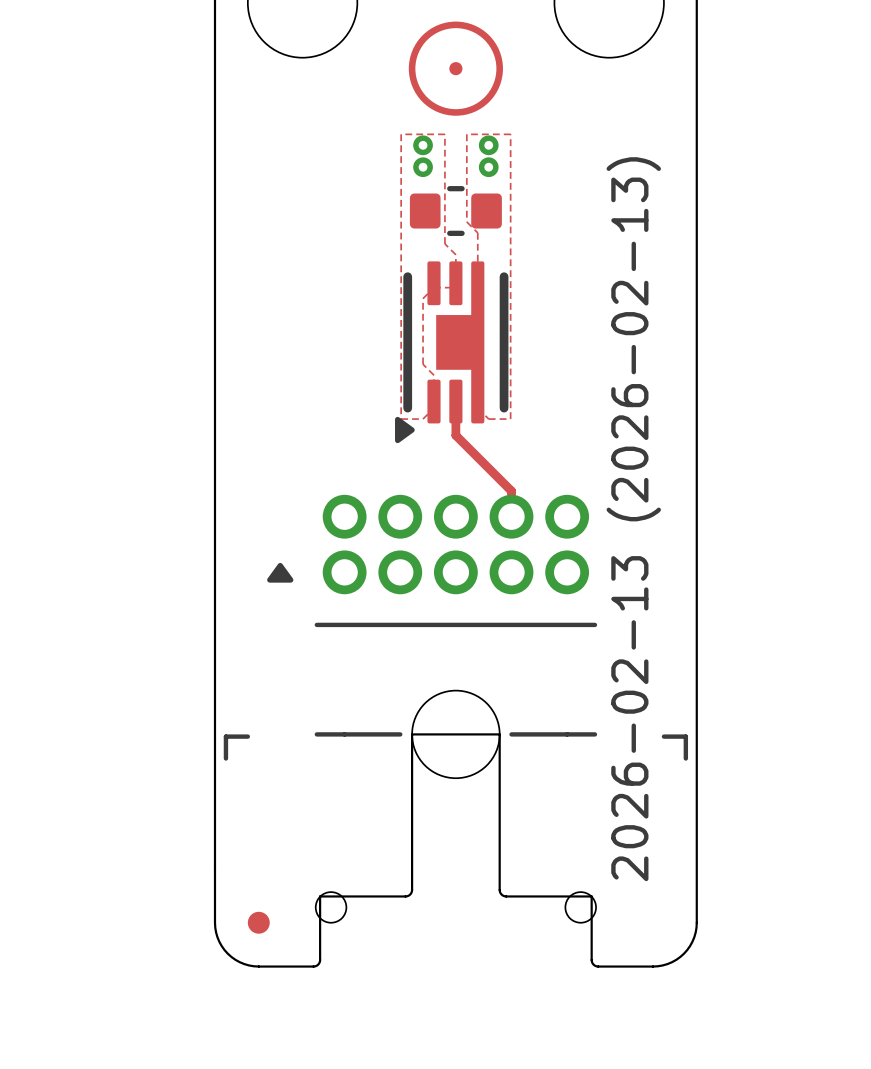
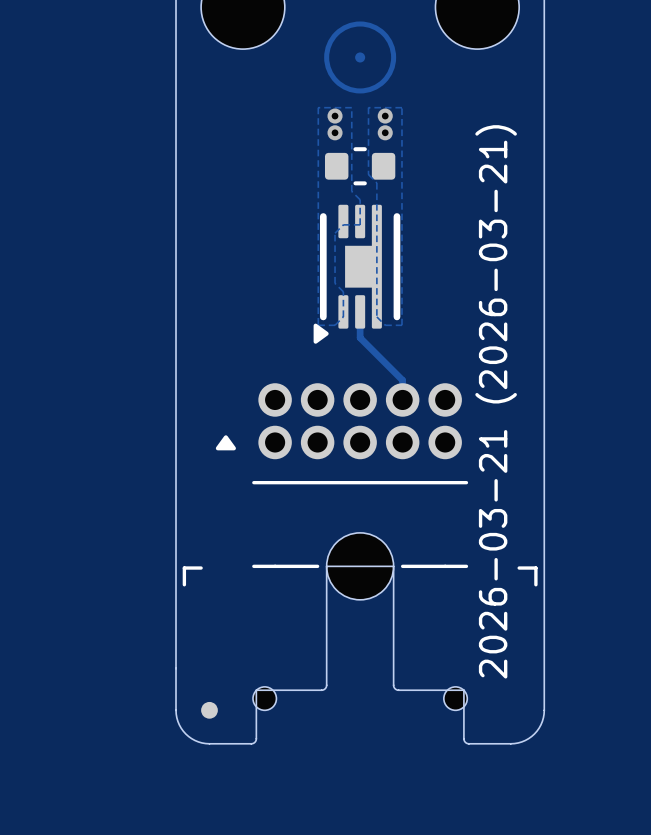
drawing shape: [606, 157, 661, 882] -> [475, 125, 517, 679]

